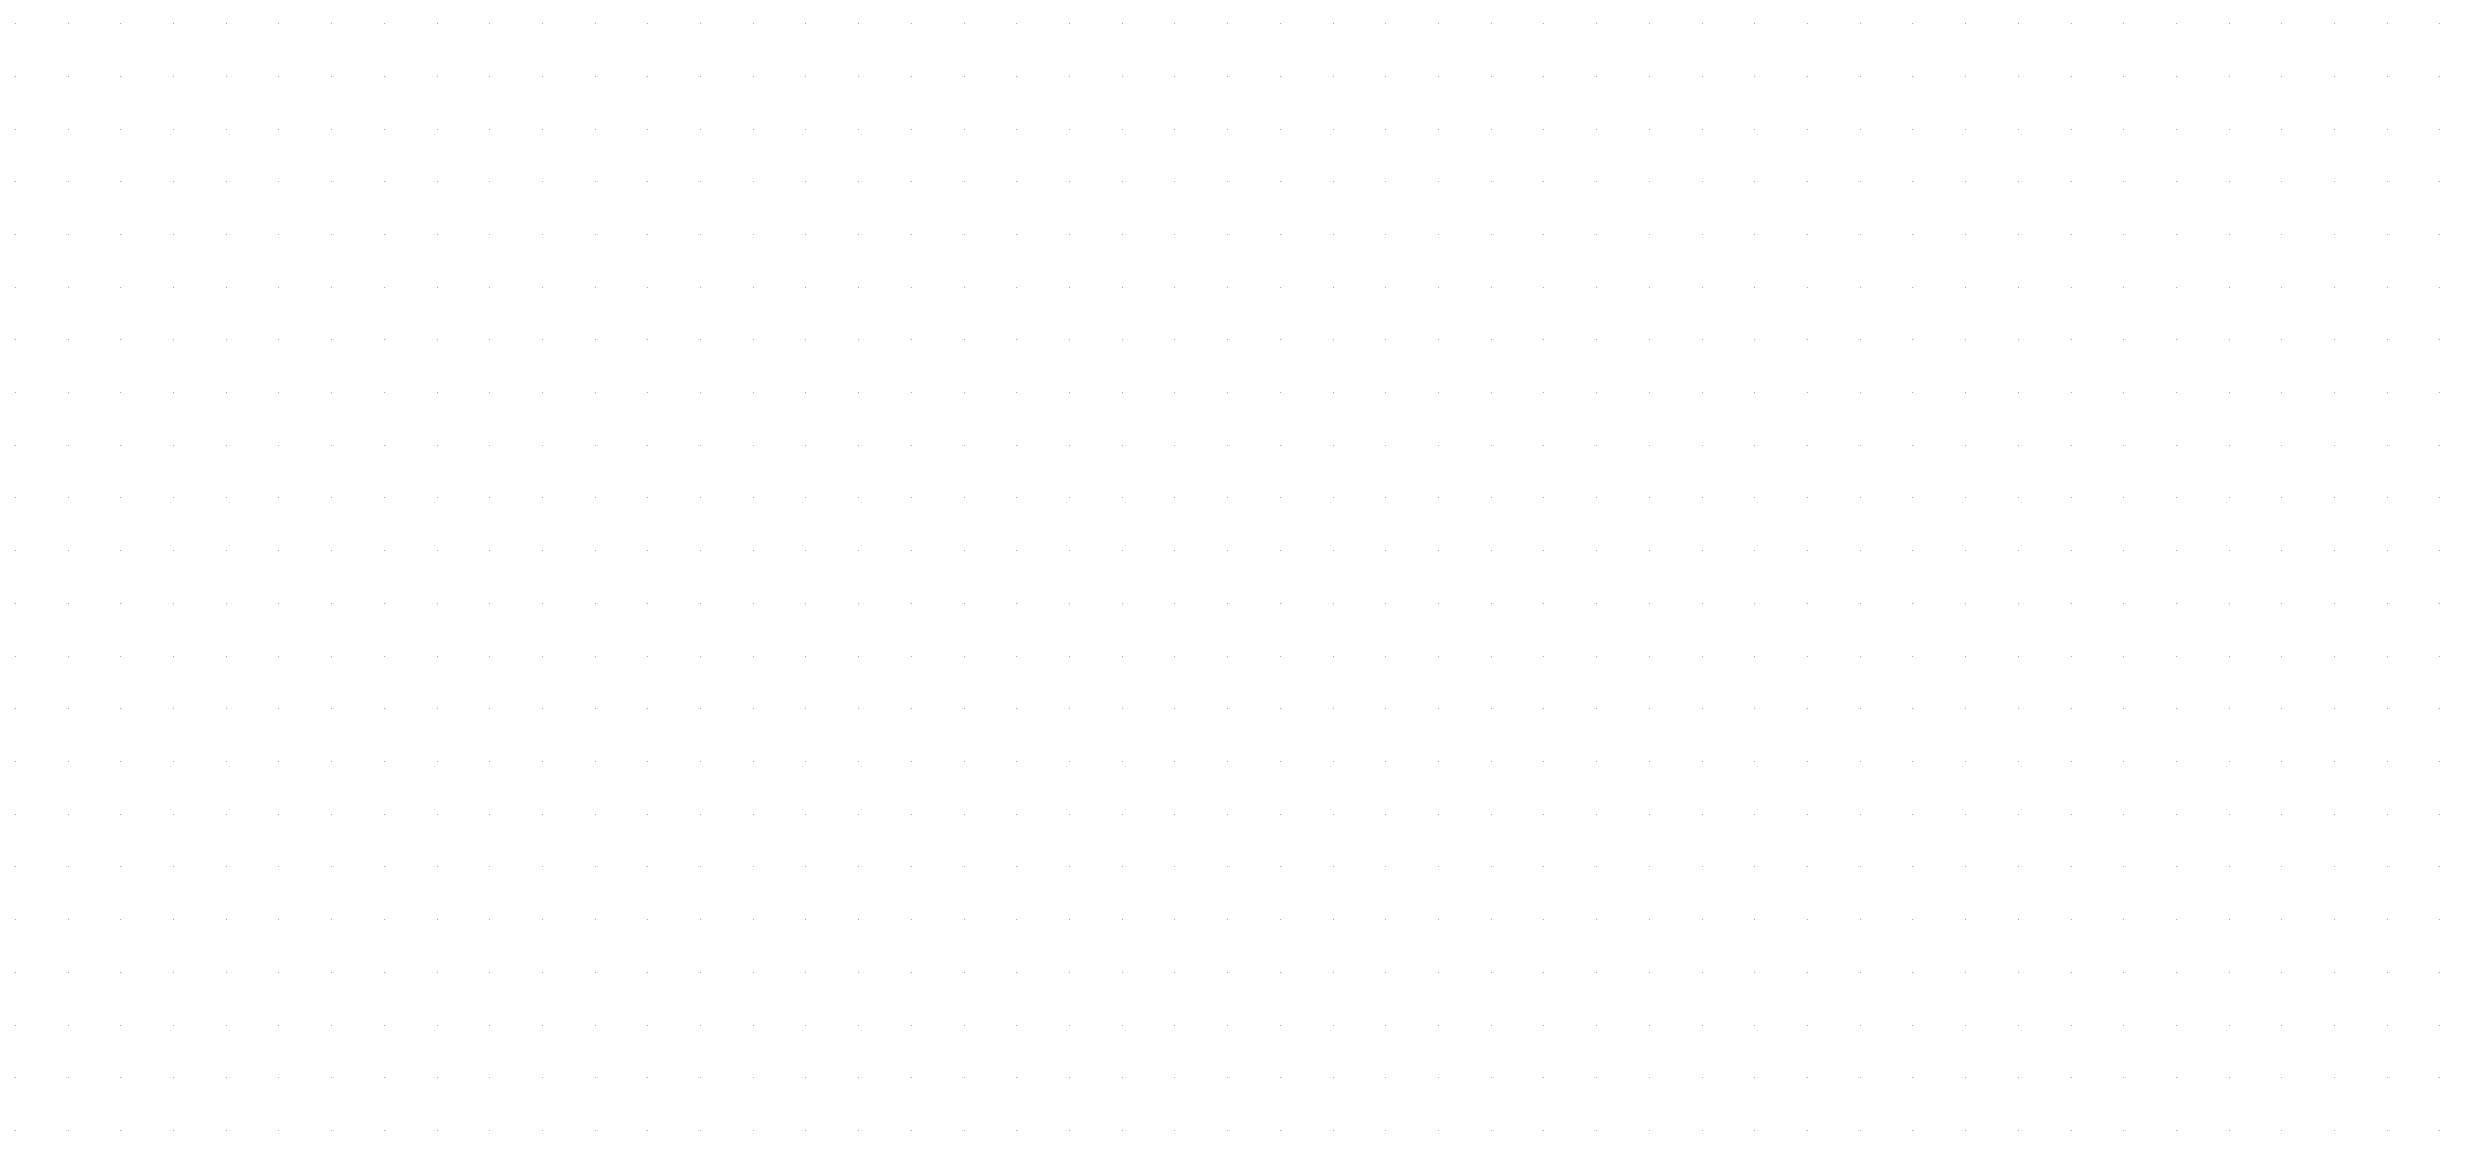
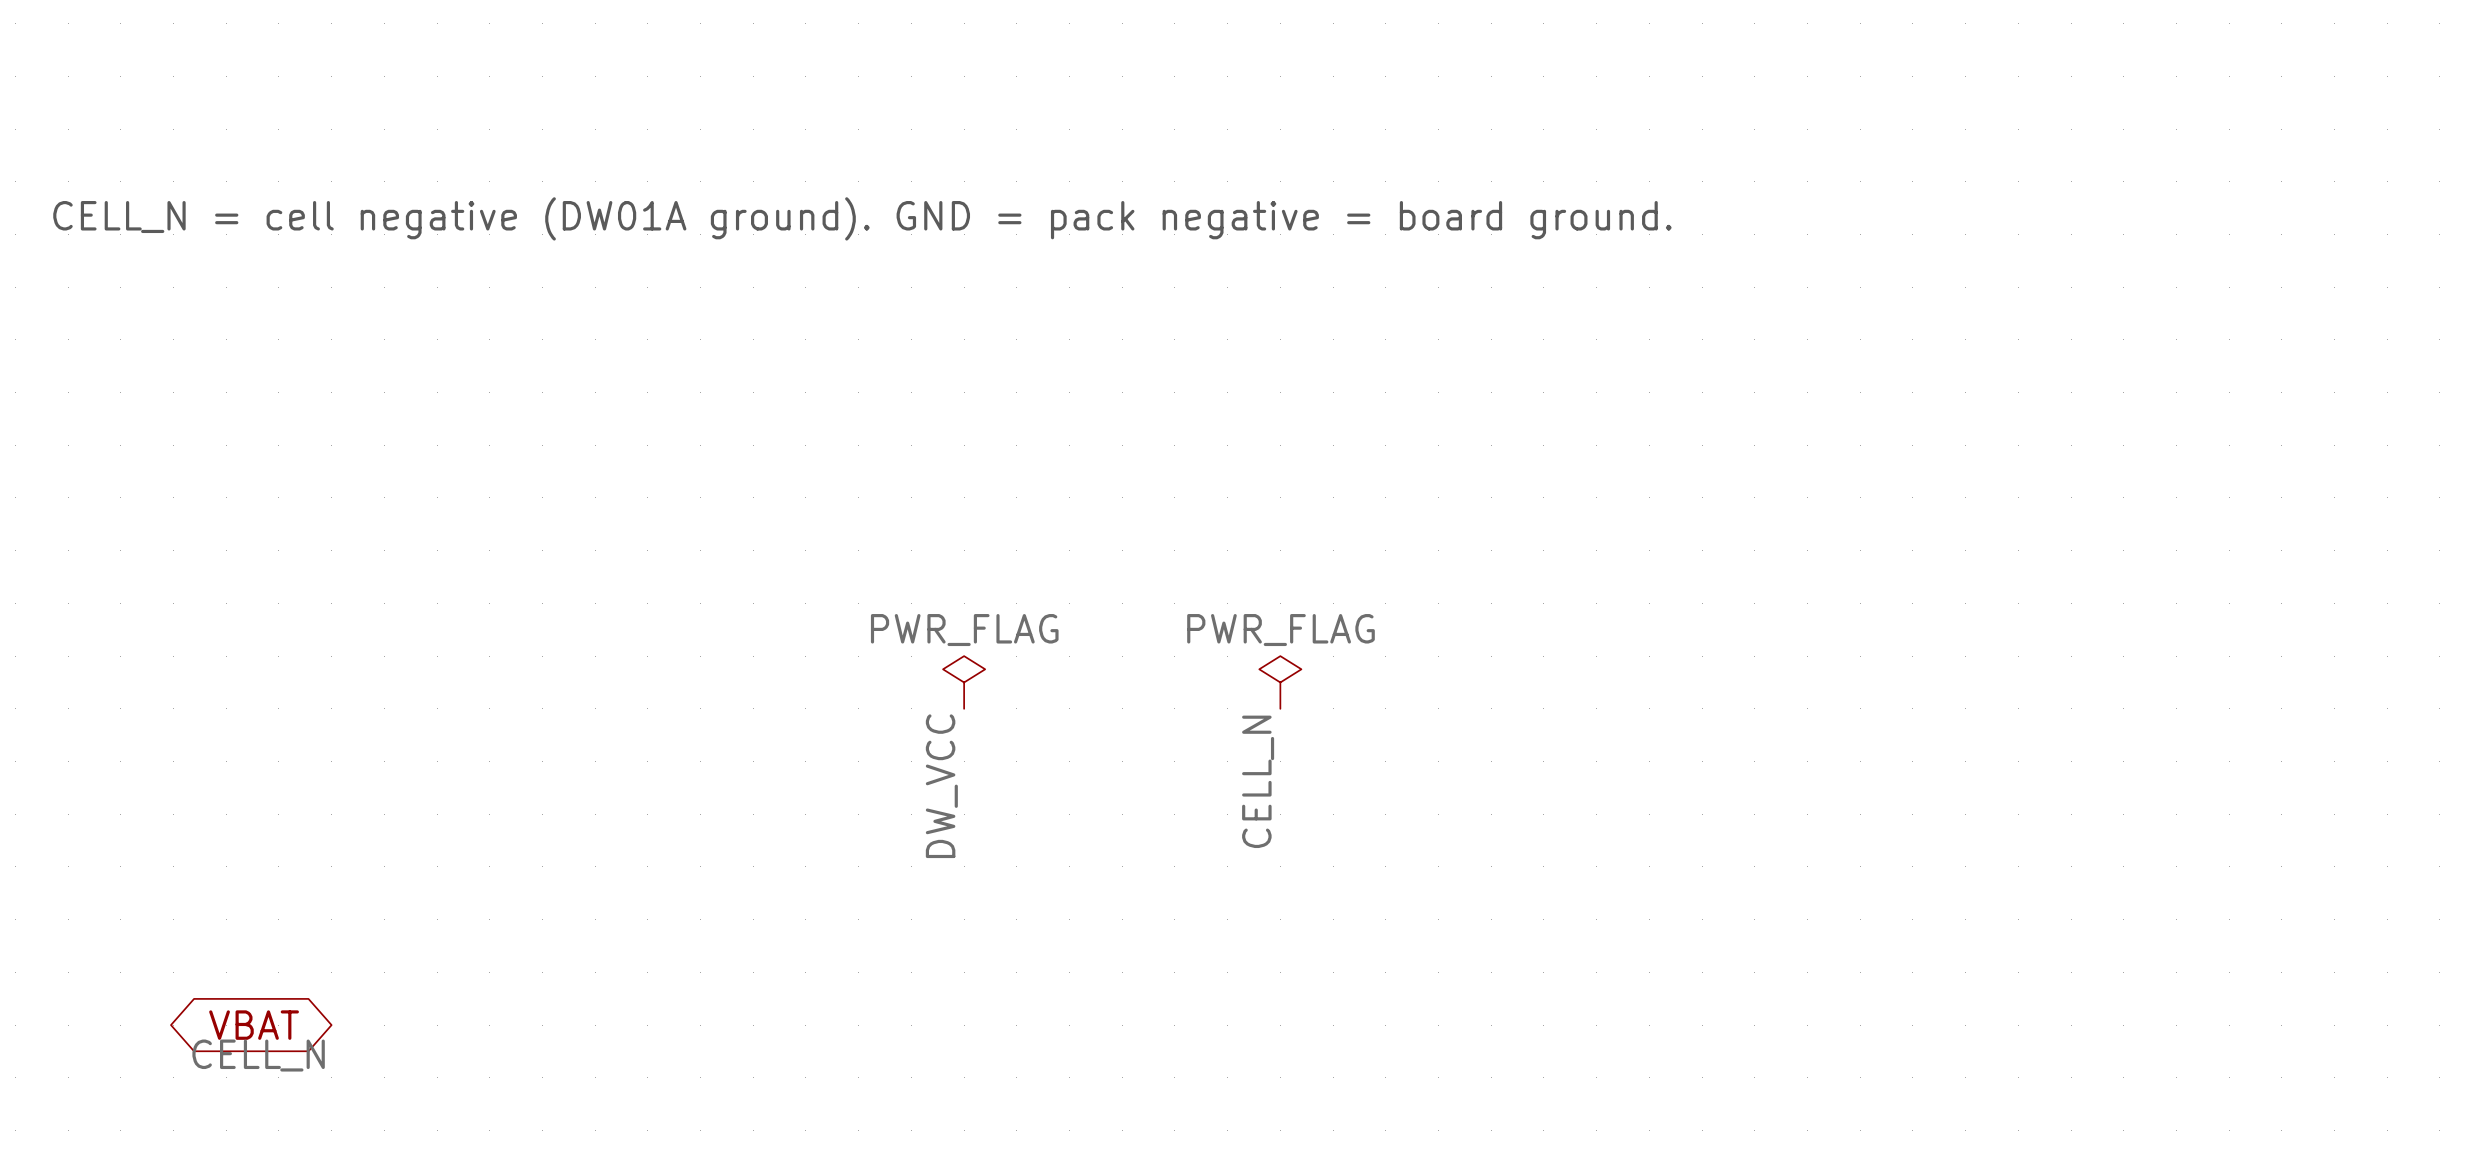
text: none -> CELL_N = cell negative (DW01A ground). GND = pack negative = board ground. (862, 218)
power symbol: none -> PWR_FLAG (964, 682)
power symbol: none -> PWR_FLAG (1280, 682)
label: none -> CELL_N (1258, 781)
label: none -> DW_VCC (941, 786)
global label: none -> VBAT (254, 1025)
label: none -> CELL_N (258, 1055)

